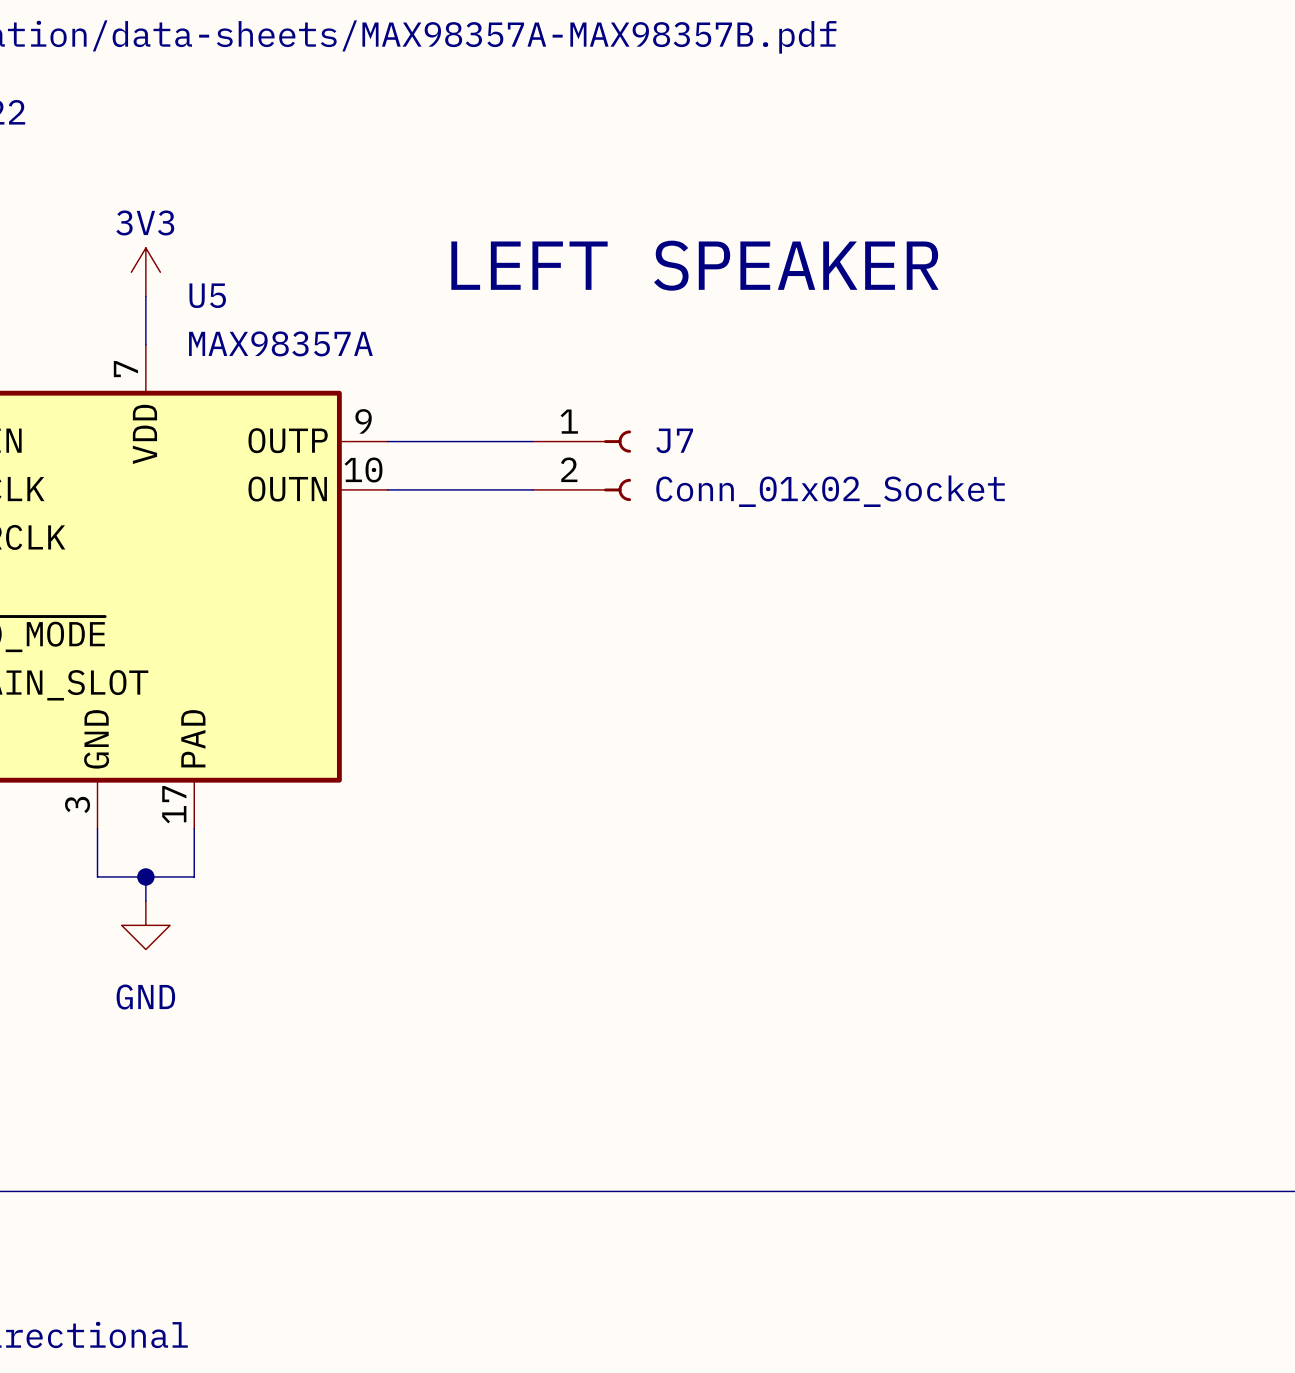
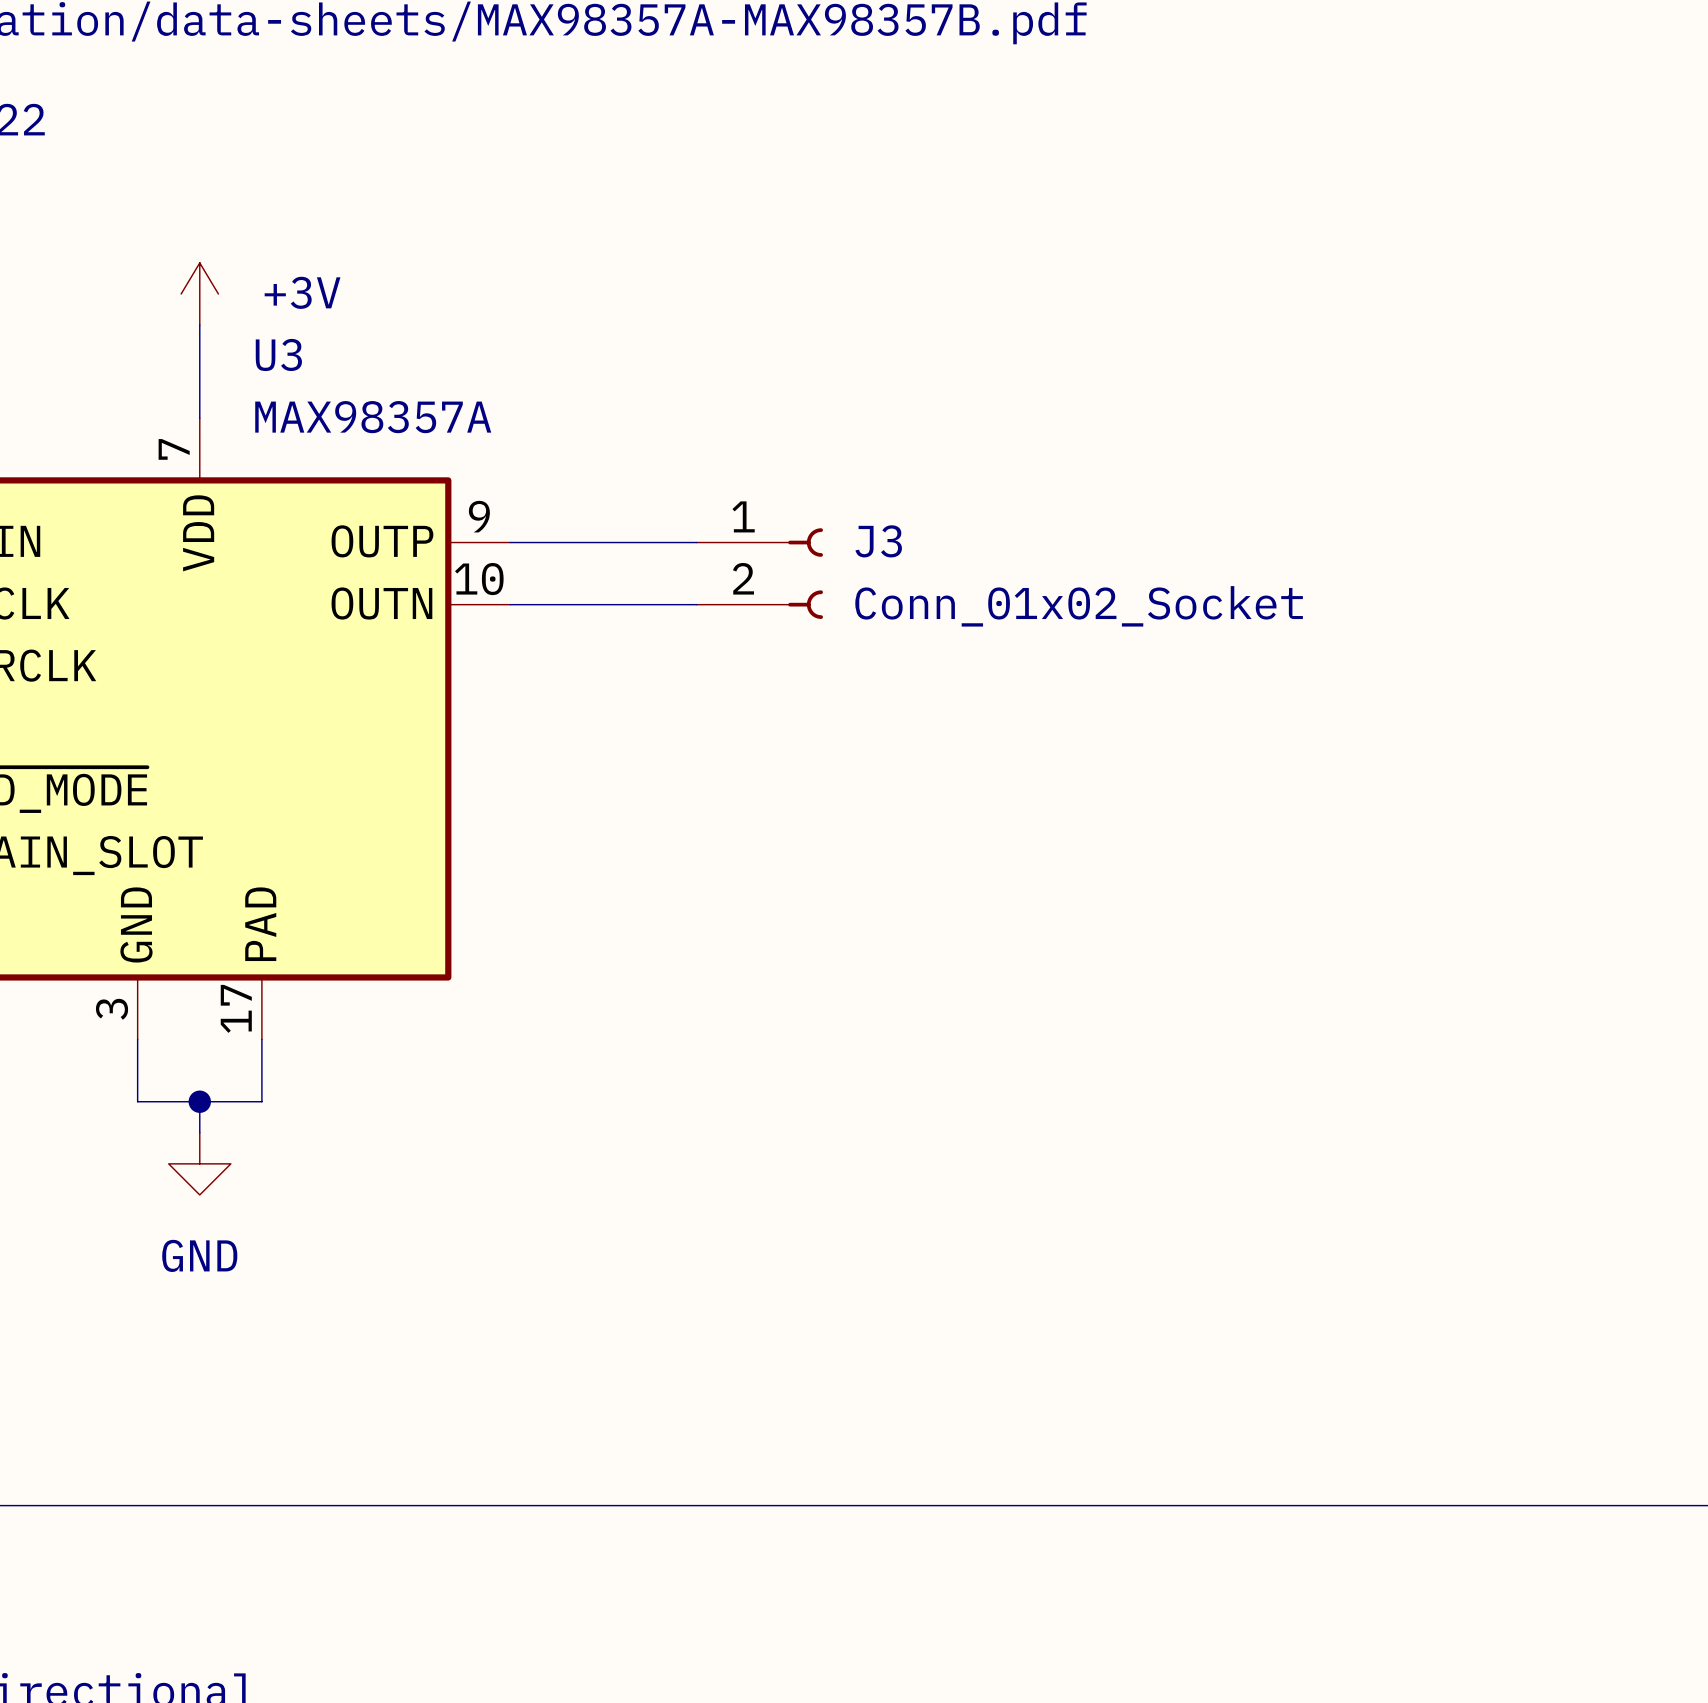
power symbol: none -> +3V (199, 294)
text: LEFT SPEAKER (694, 265) -> none
power symbol: 3V3 (145, 272) -> none
U5 name: U5 (207, 295) -> U3 (278, 354)
J7 name: J7 (674, 440) -> J3 (878, 541)

